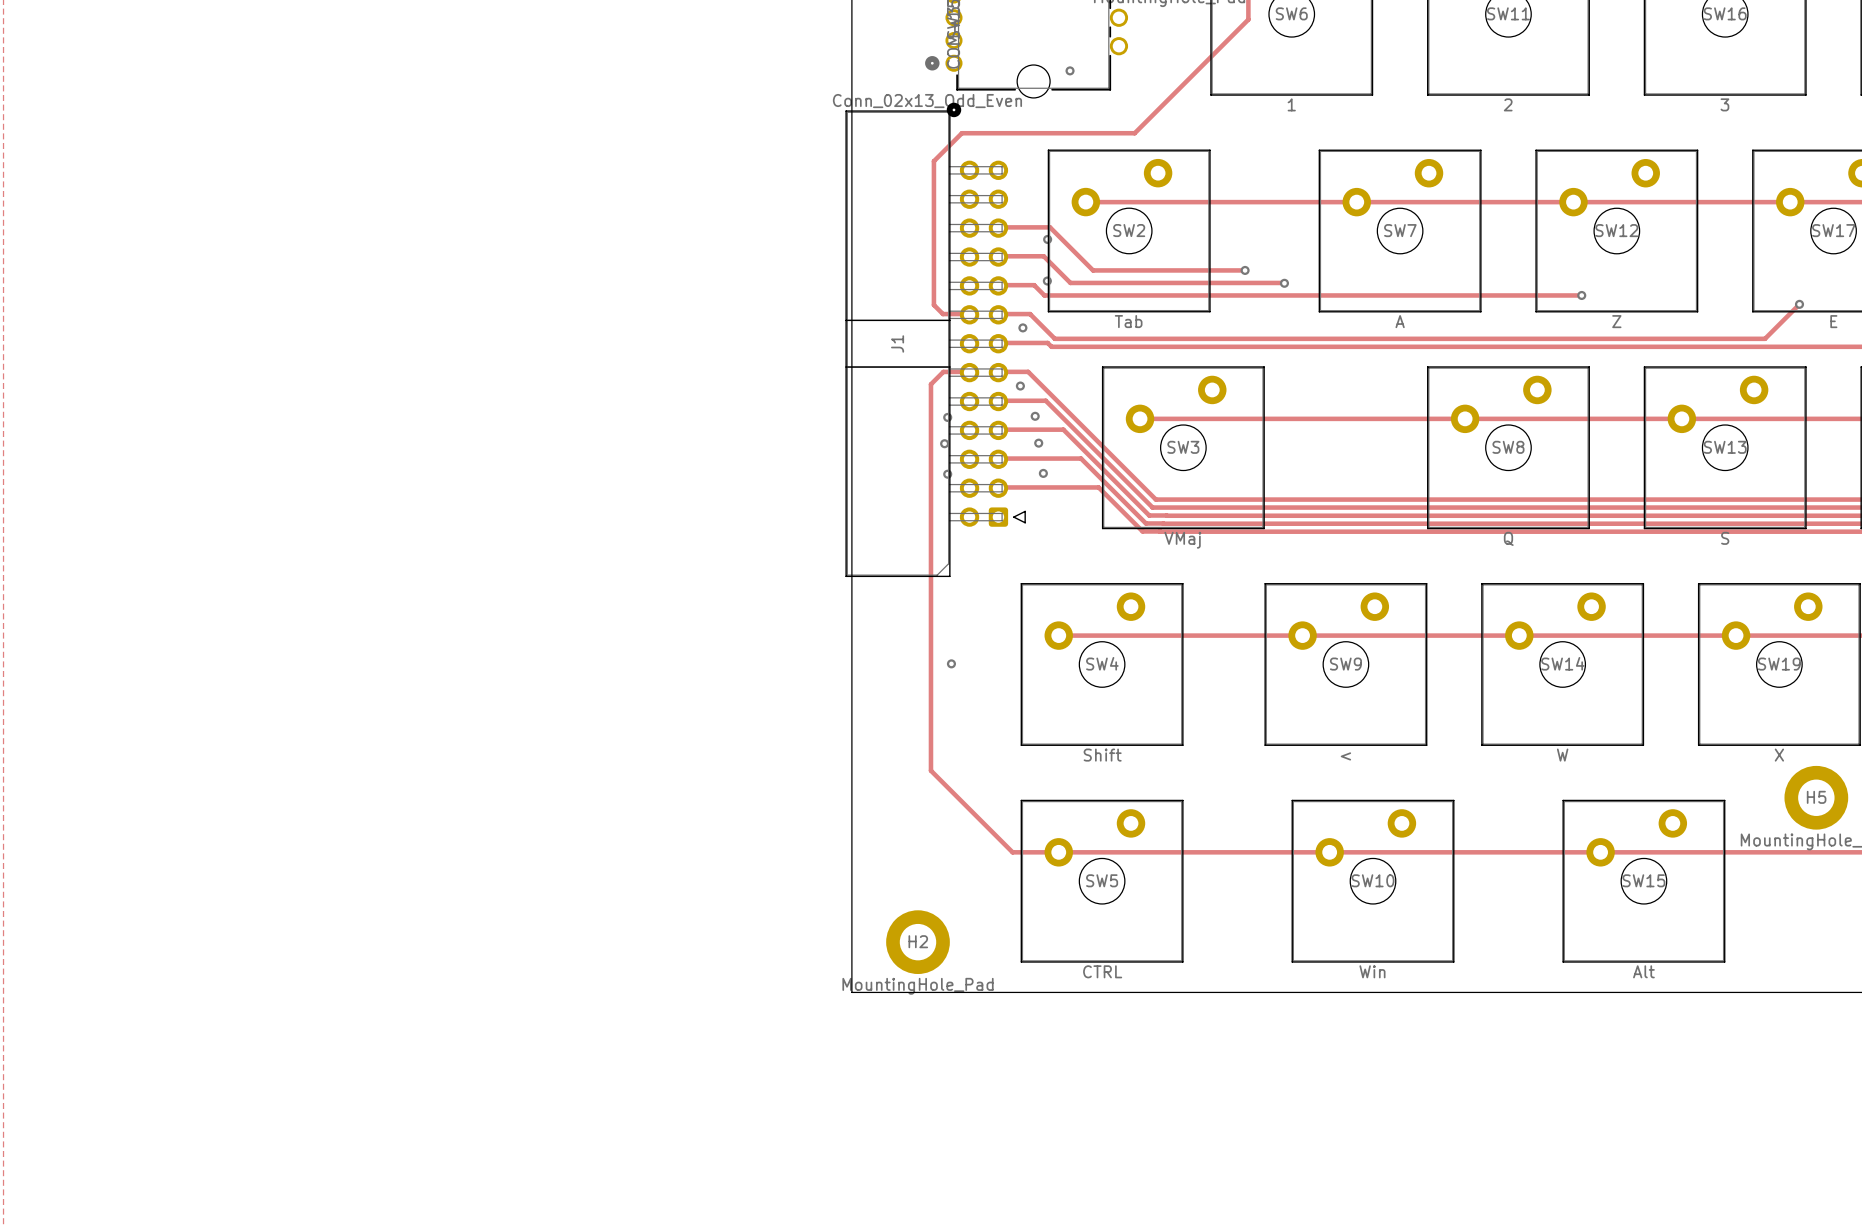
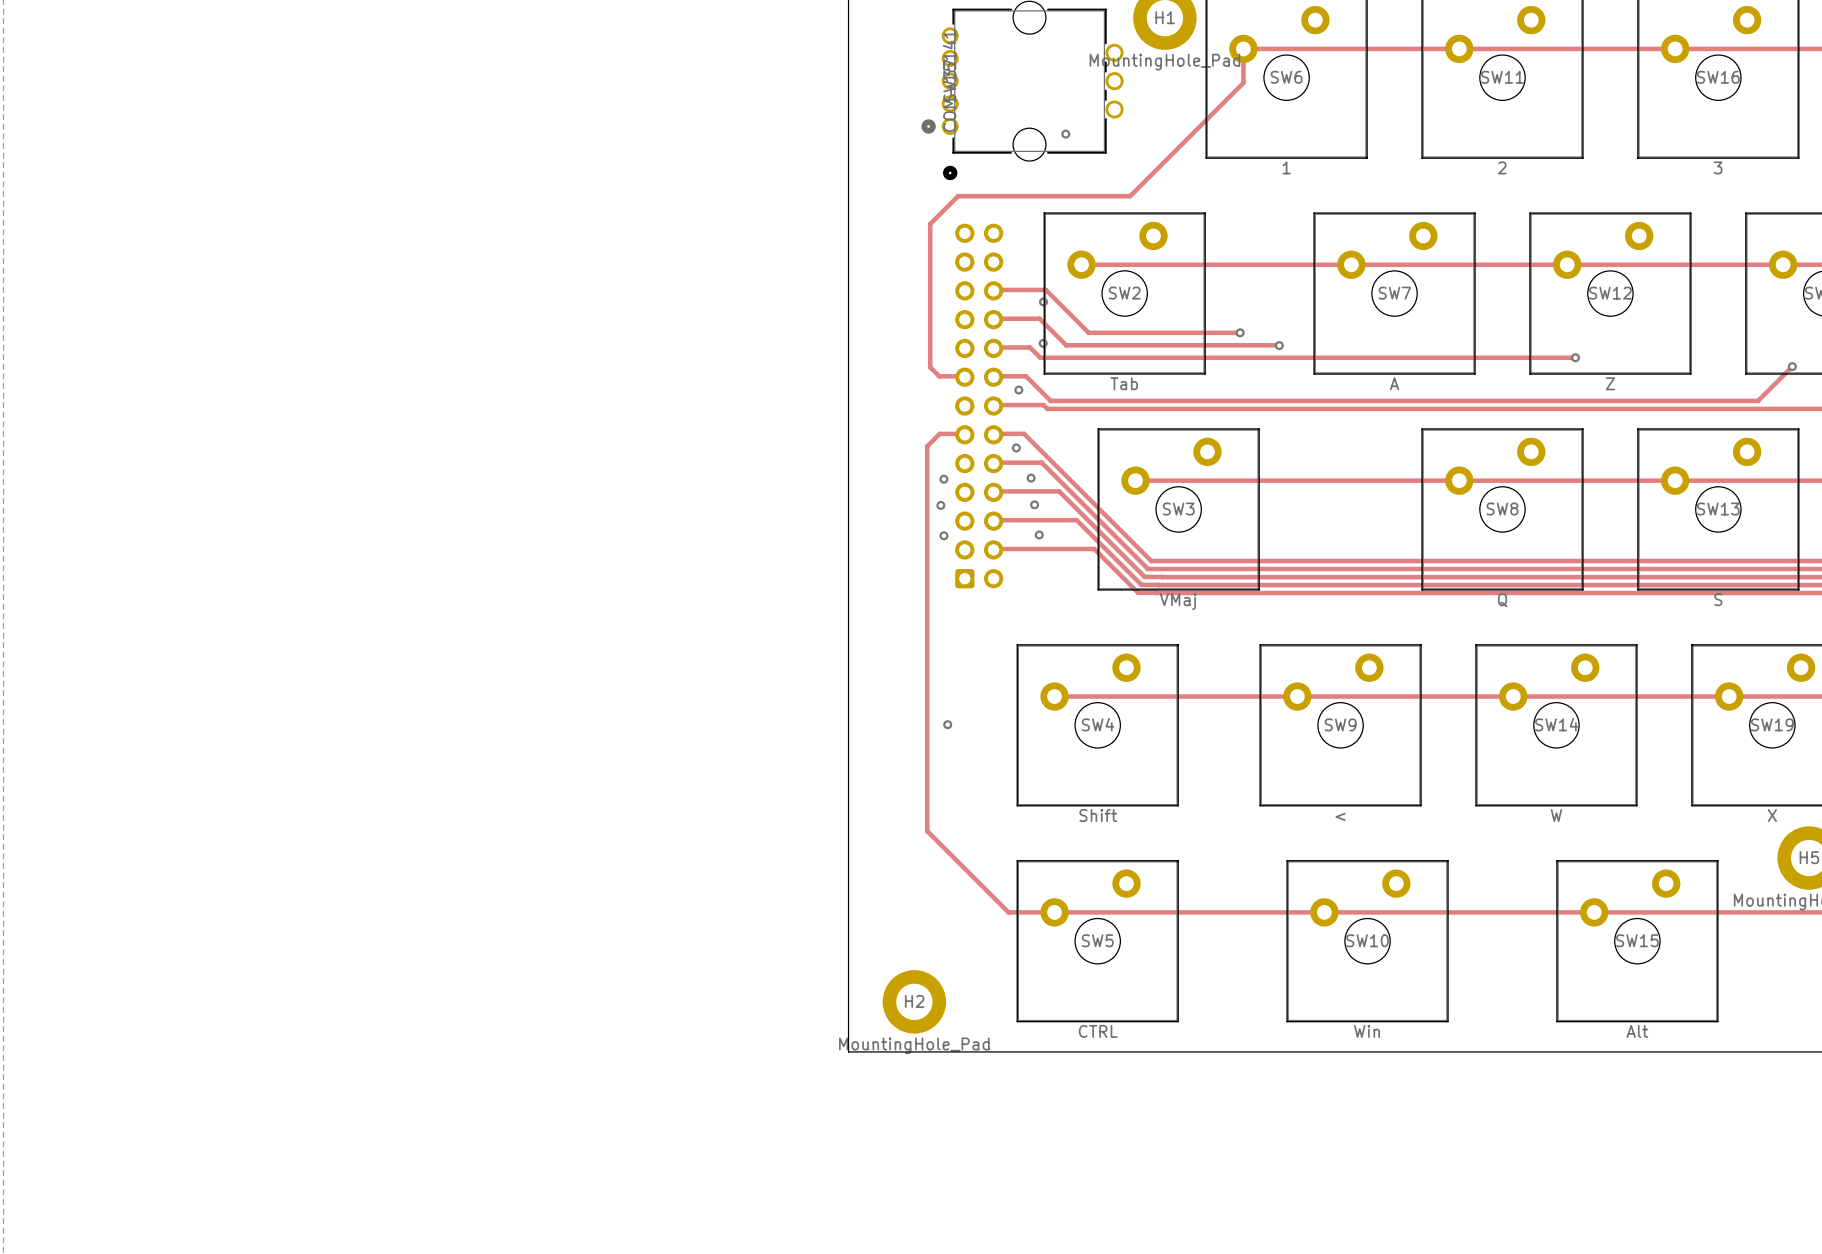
J1 side: top (935, 343) -> bottom (979, 406)

